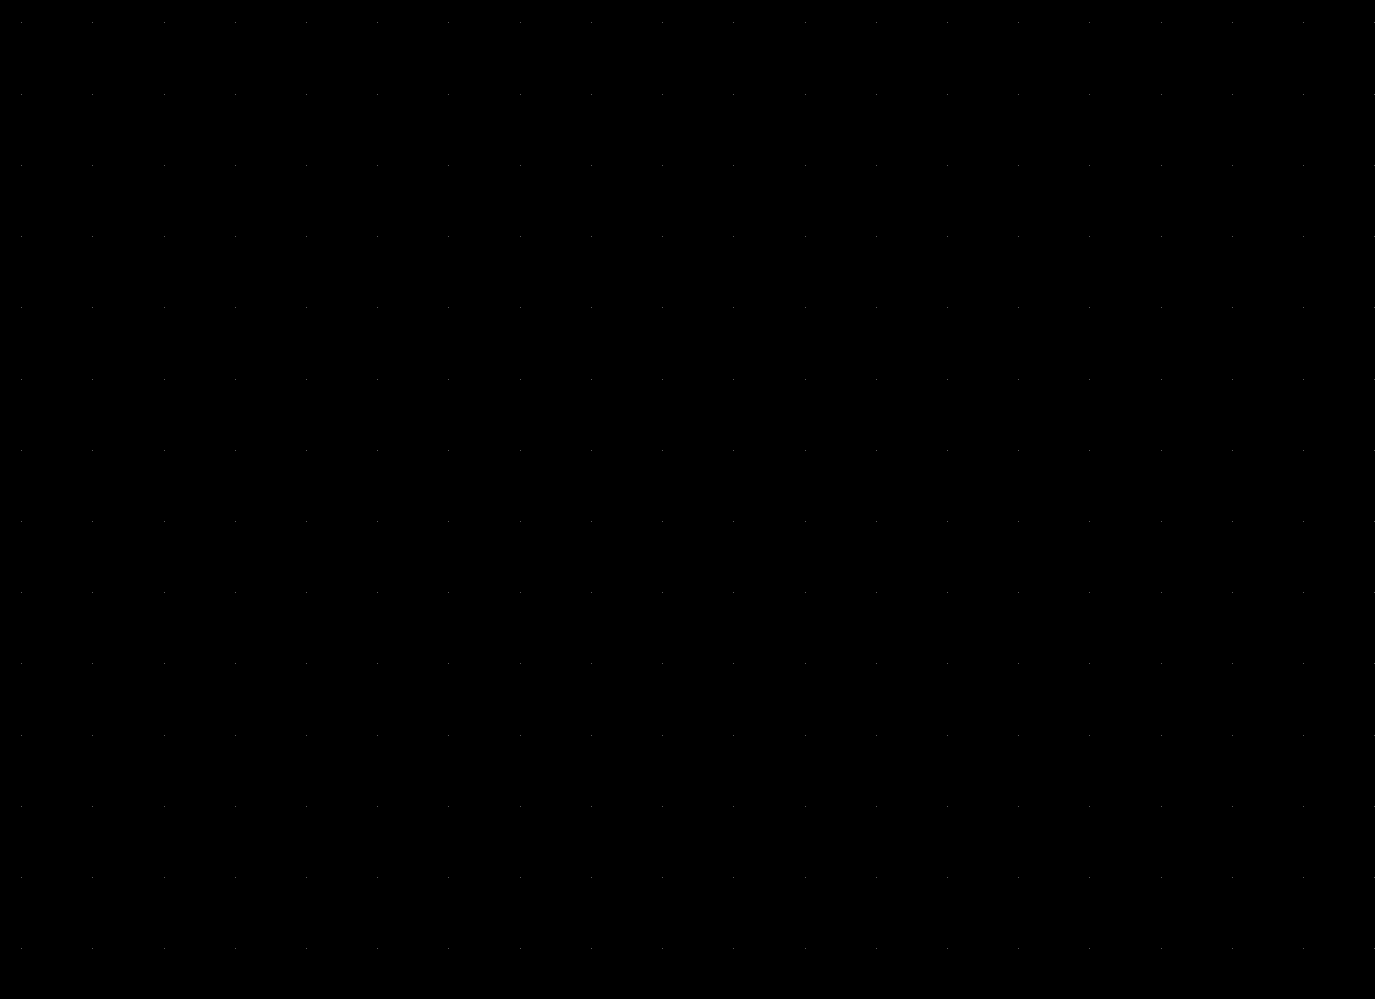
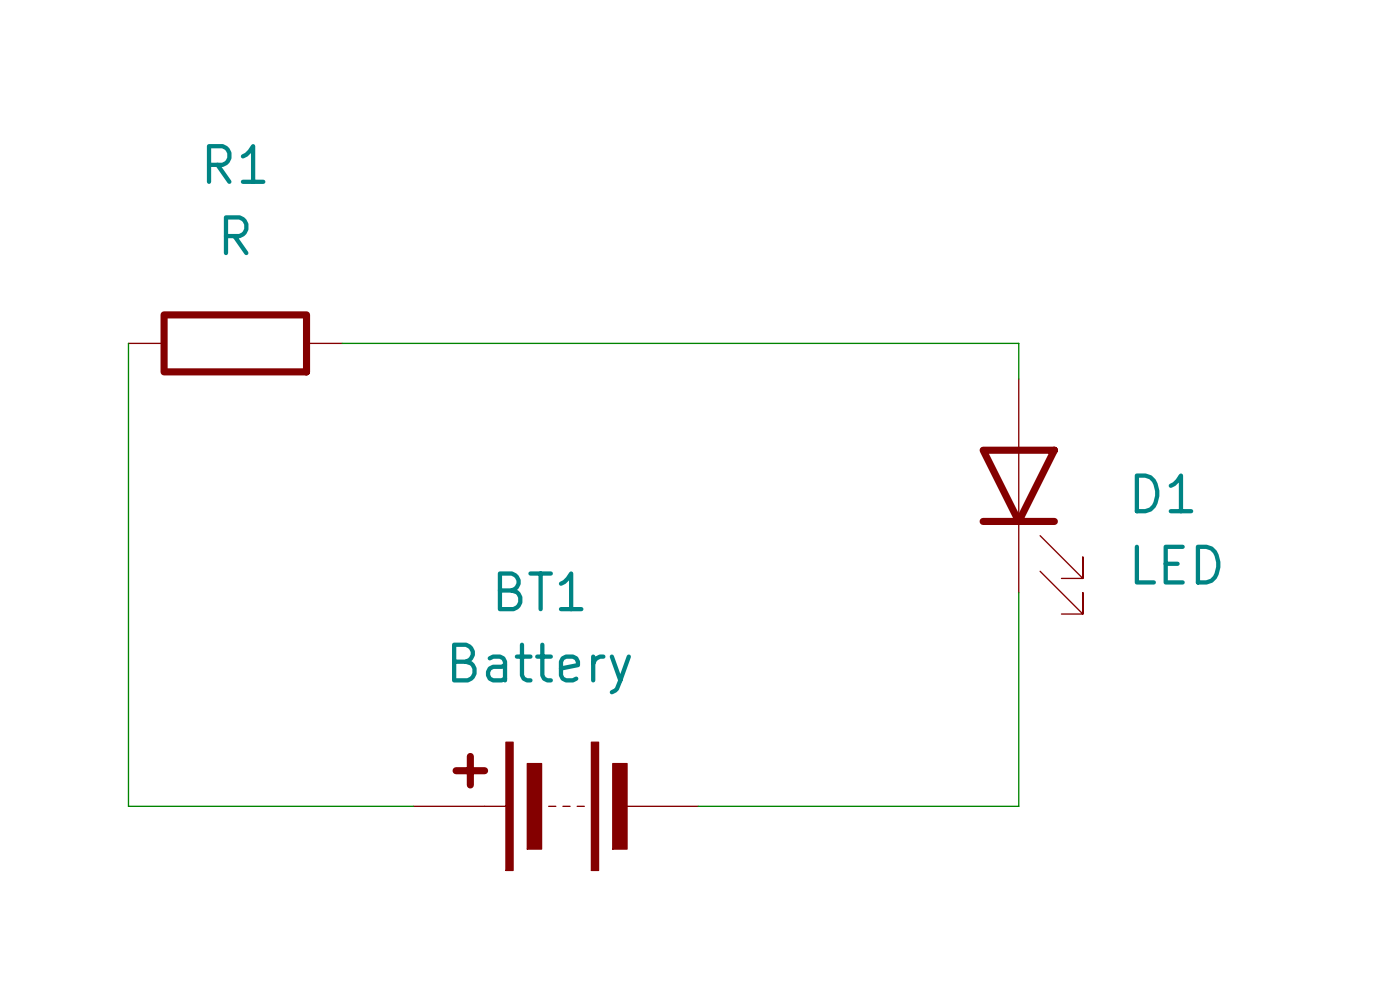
wire: none -> (128, 343) (128, 806) (413, 806)
R1: none -> R (235, 343)
wire: none -> (342, 343) (1018, 343) (1018, 379)
D1: none -> LED (1031, 496)
wire: none -> (1018, 592) (1018, 806) (698, 806)
BT1: none -> Battery (555, 806)

